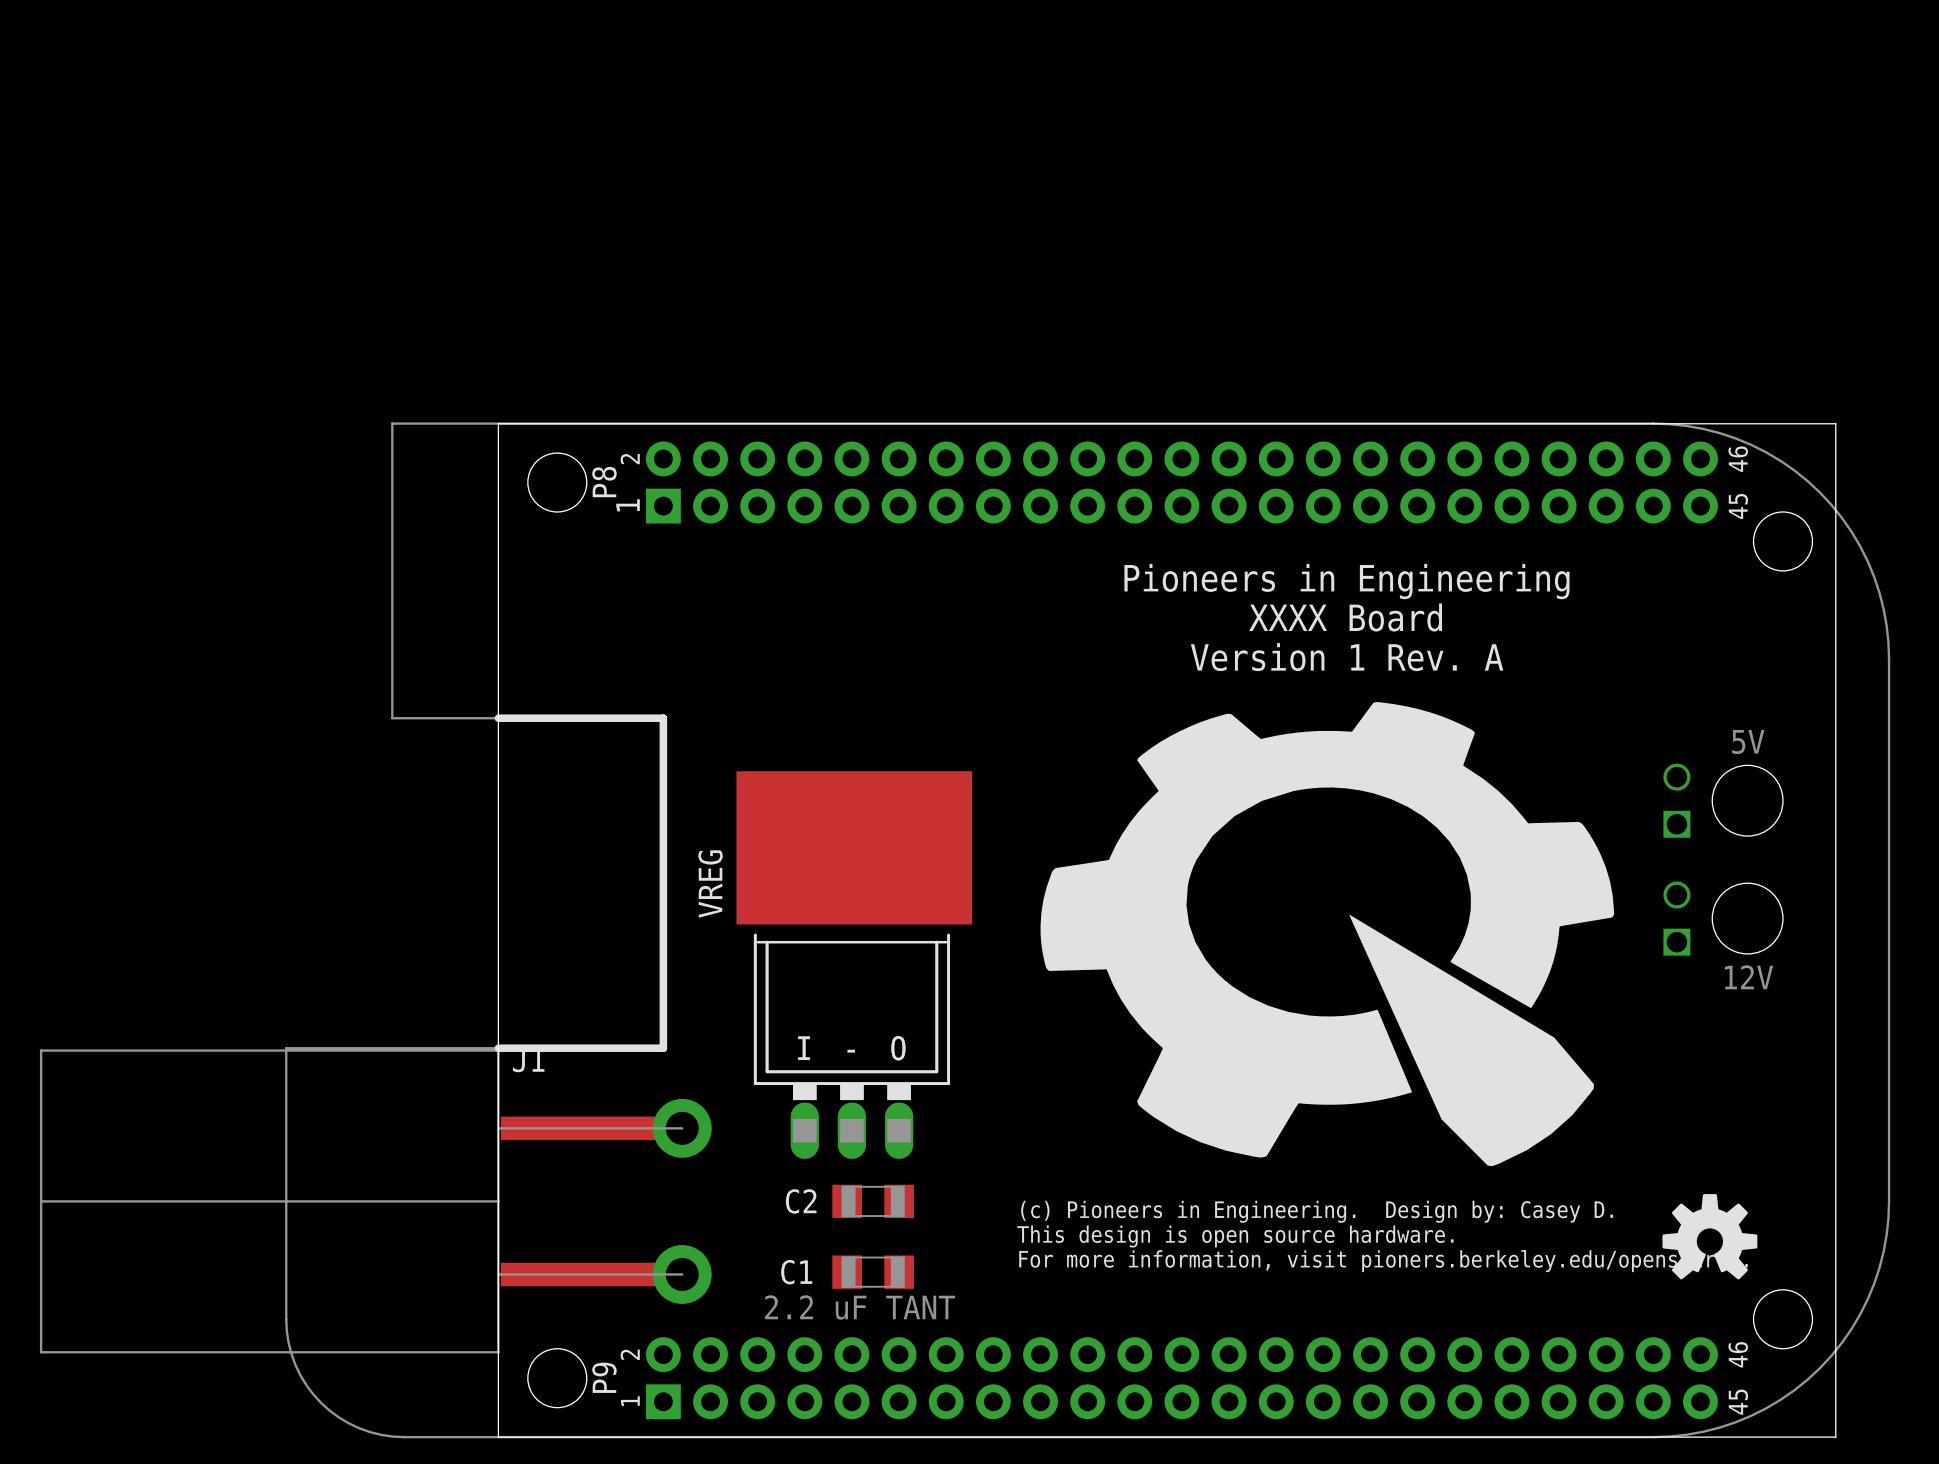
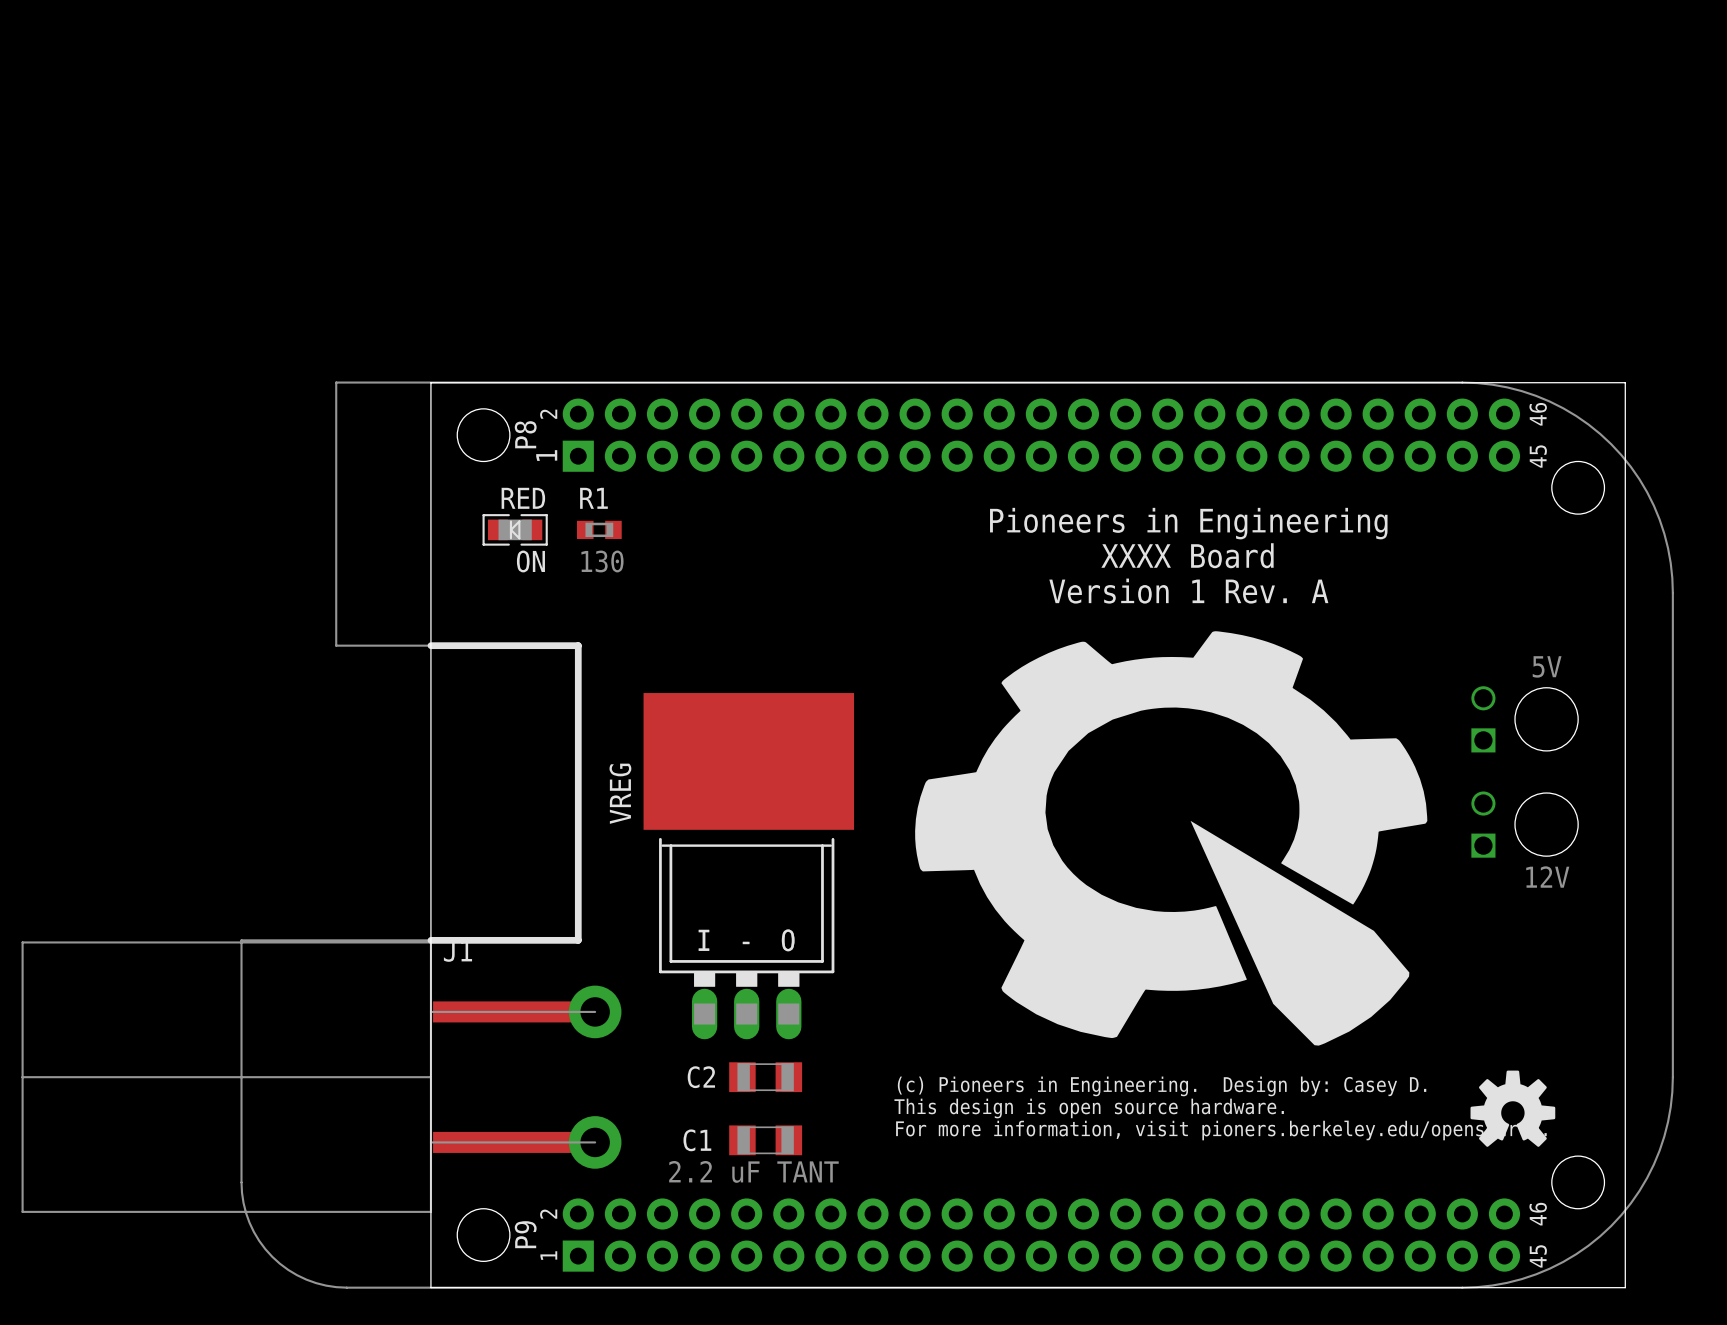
ON: none -> RED (515, 529)
R1: none -> 130 (599, 529)

